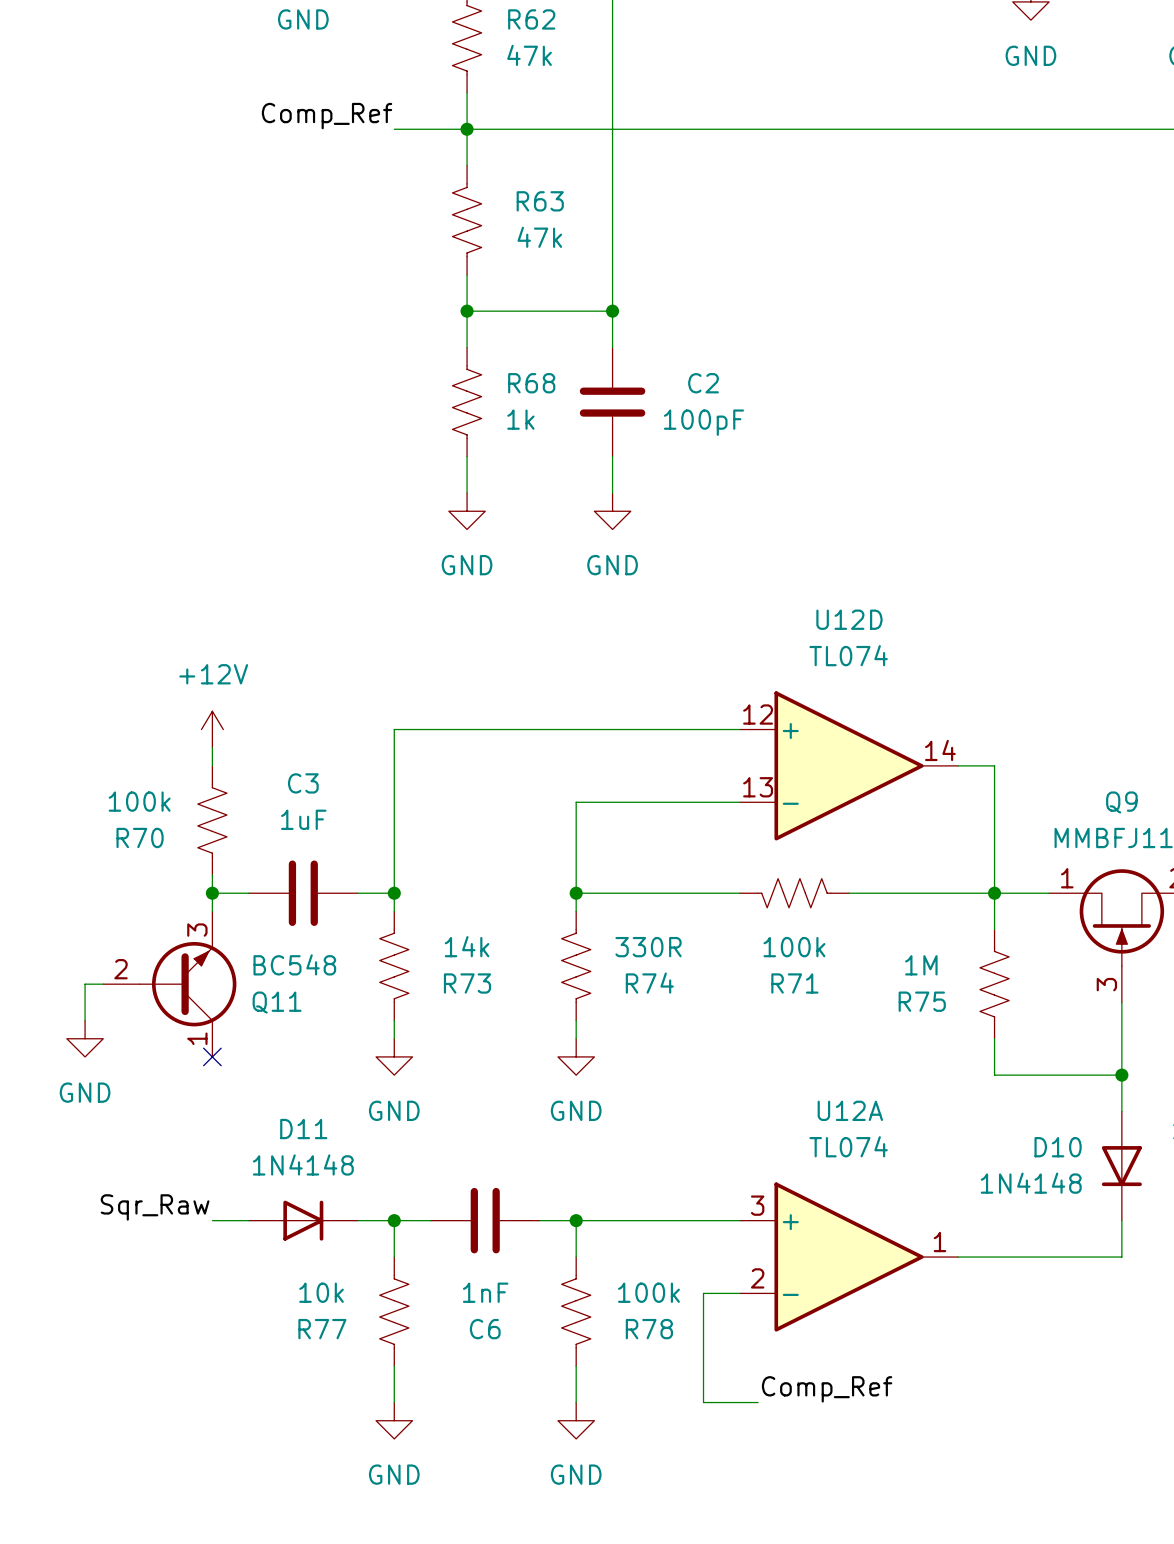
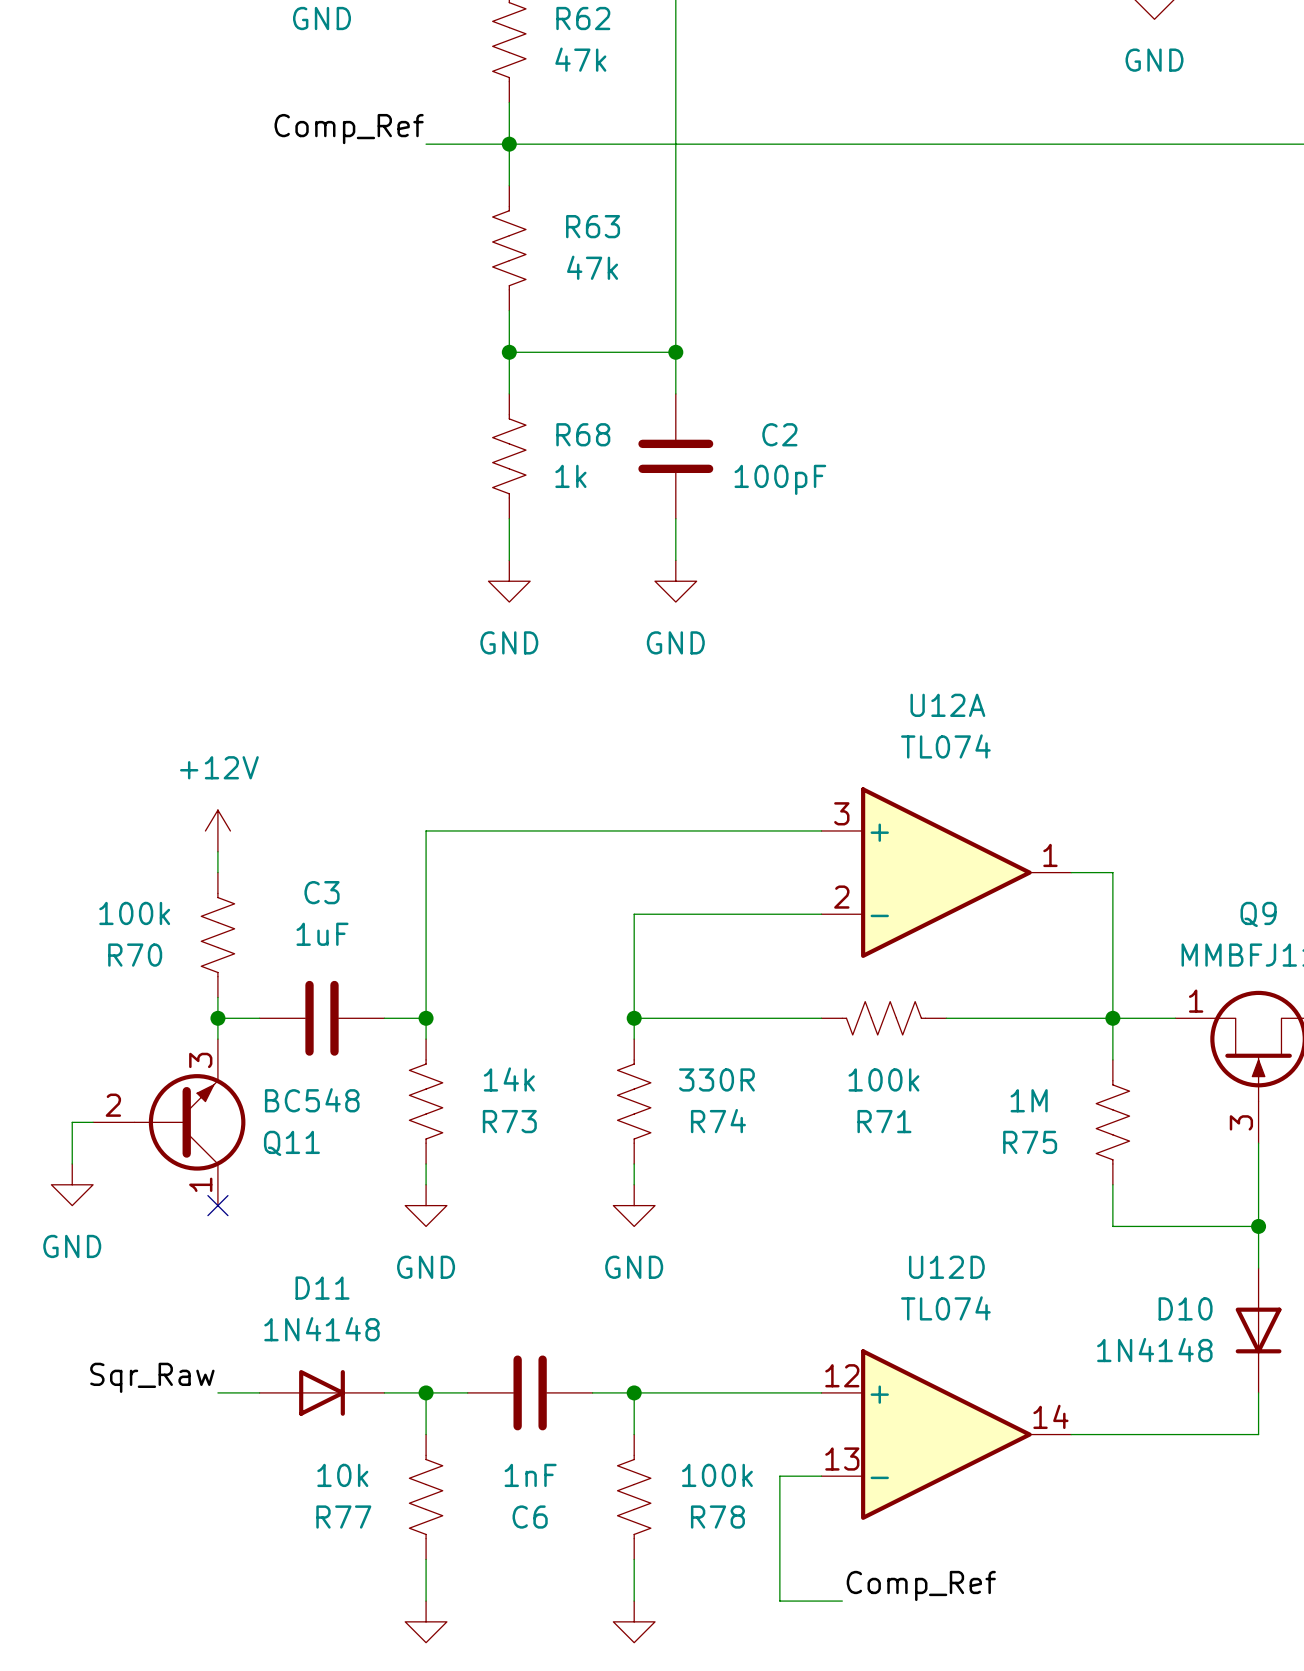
U12D position: (849, 765) -> (946, 1434)
U12A position: (849, 1257) -> (946, 872)

